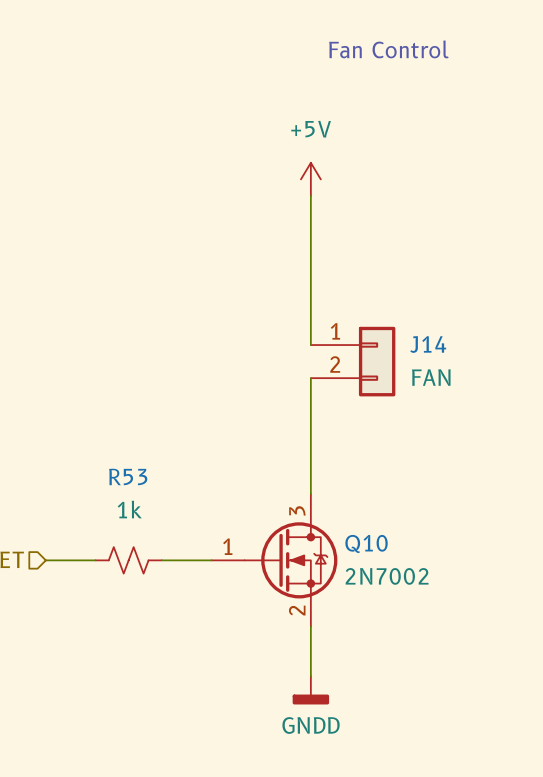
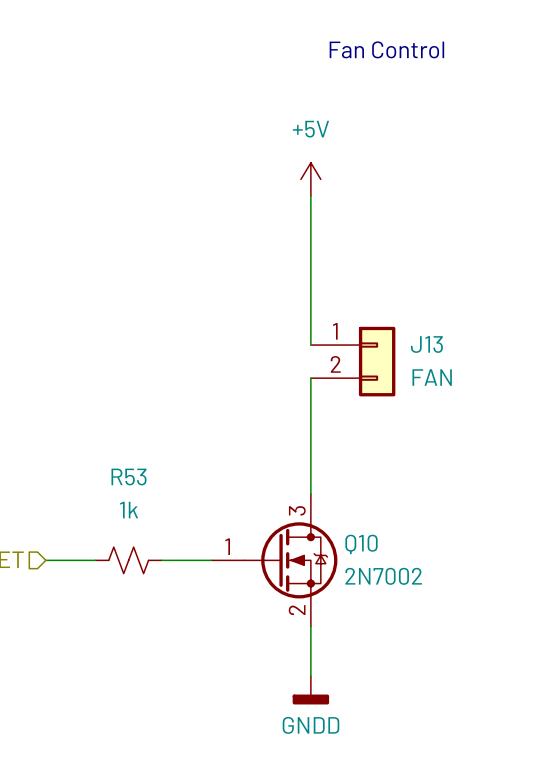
J14 name: J14 (428, 344) -> J13 (426, 344)

